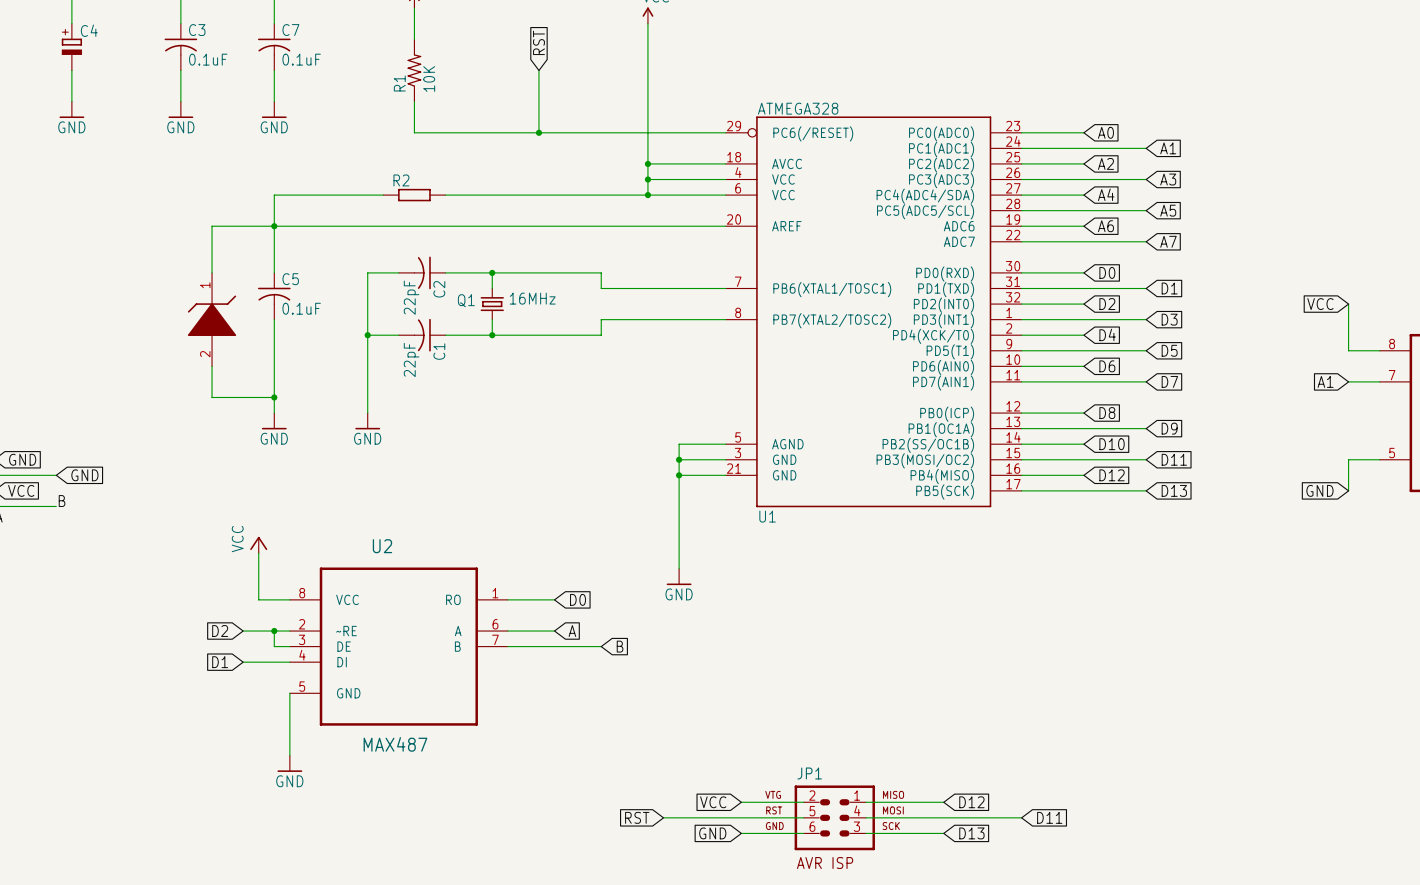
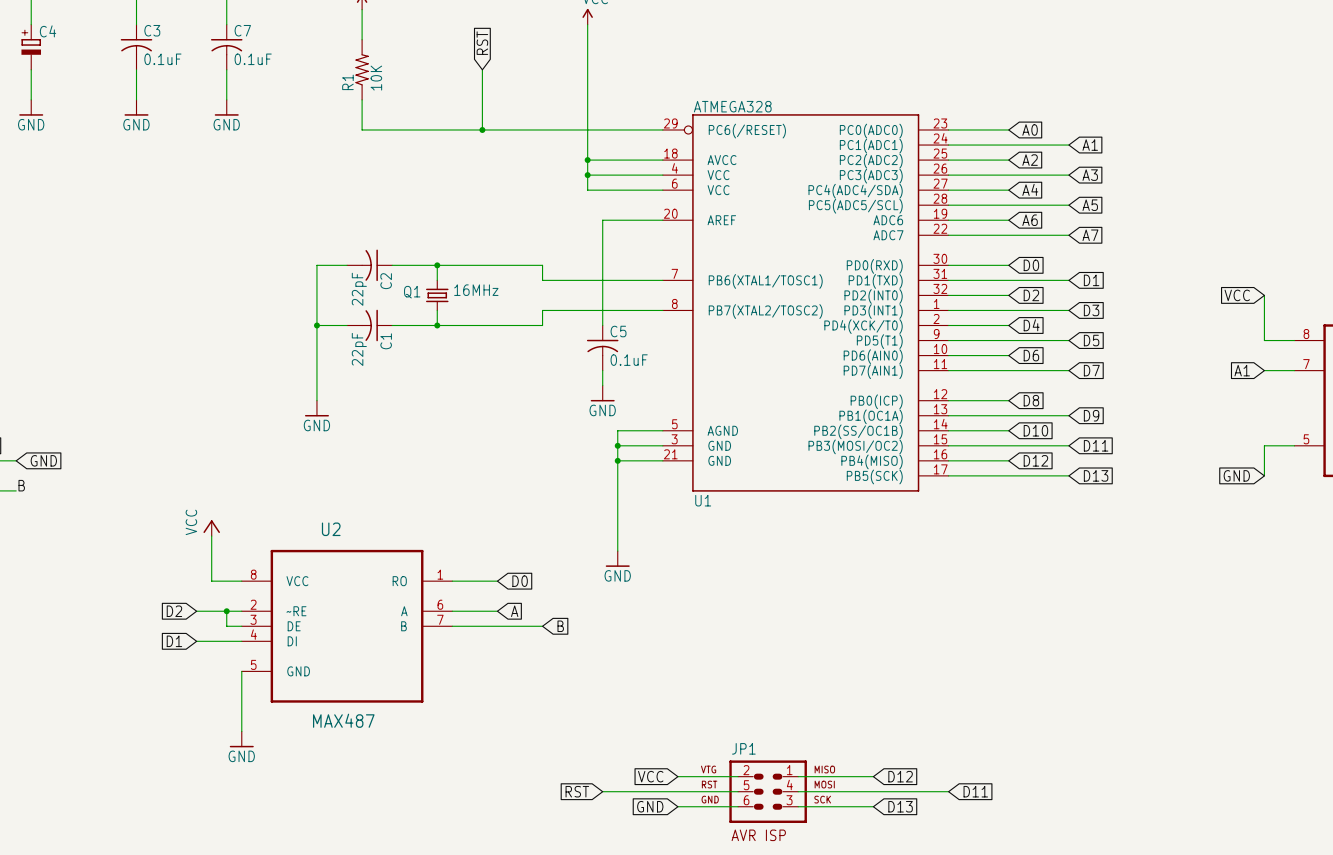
wire: (383, 195) (274, 195) (274, 272) -> none
R2: (414, 195) -> none
wire: (445, 195) (647, 195) -> none
junction: (647, 195) -> none
junction: (274, 226) -> none
wire: (663, 226) (212, 226) (212, 272) -> (602, 220) (602, 325)
C5 position: (274, 296) -> (602, 348)
part: (212, 319) -> none
wire: (274, 319) (274, 413) -> none
wire: (212, 366) (212, 397) (274, 397) -> none
wire: none -> (602, 370) (602, 385)
junction: (274, 397) -> none
power symbol: none -> GND (602, 393)
power symbol: GND (274, 421) -> none

